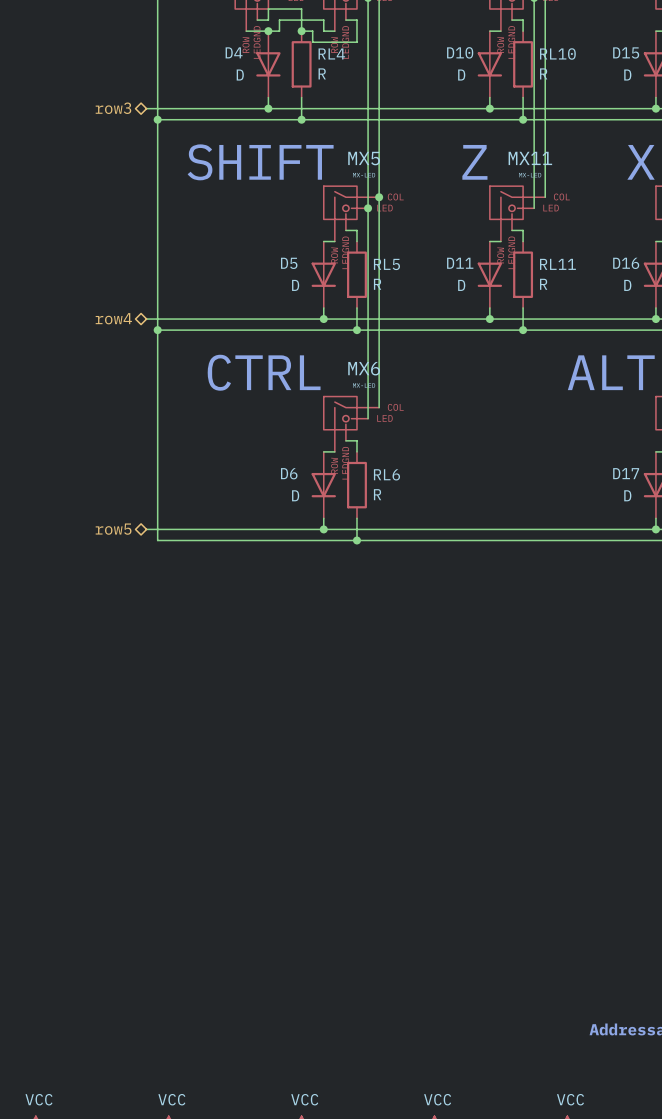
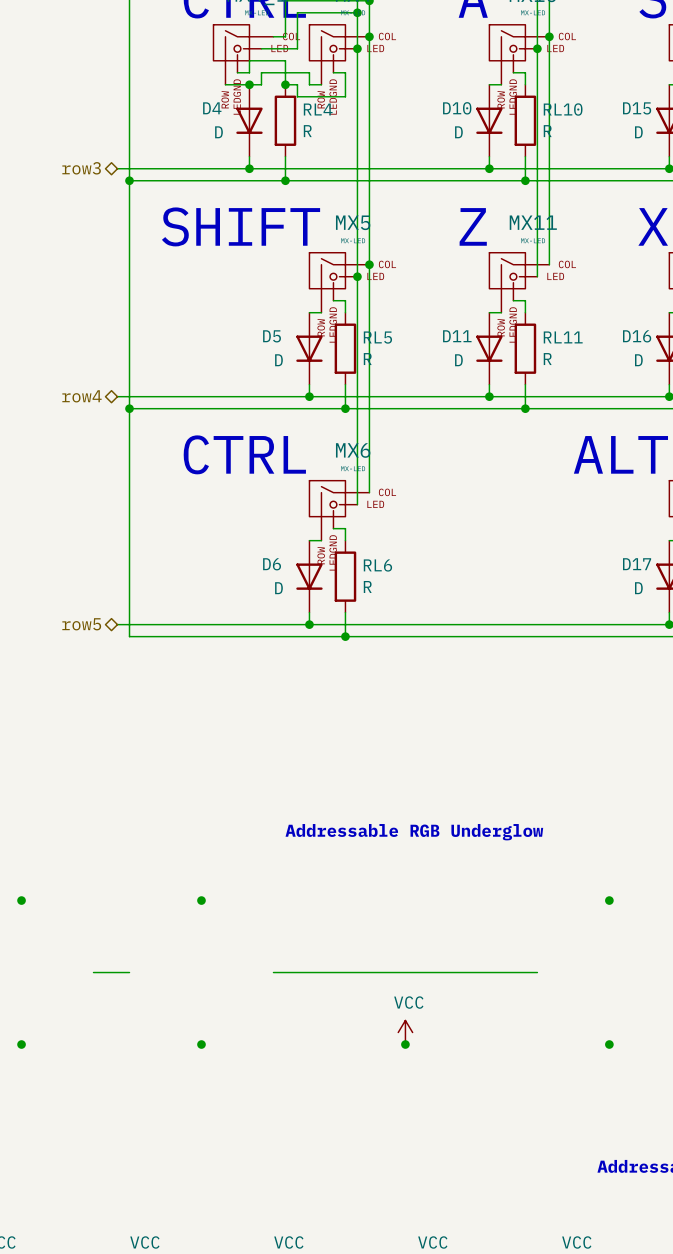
text: none -> Addressable RGB Underglow (414, 832)
junction: none -> (21, 900)
junction: none -> (201, 900)
junction: none -> (609, 900)
wire: none -> (93, 972) (129, 972)
wire: none -> (273, 972) (537, 972)
power symbol: none -> VCC (405, 1032)
junction: none -> (21, 1044)
junction: none -> (201, 1044)
junction: none -> (405, 1044)
junction: none -> (609, 1044)

